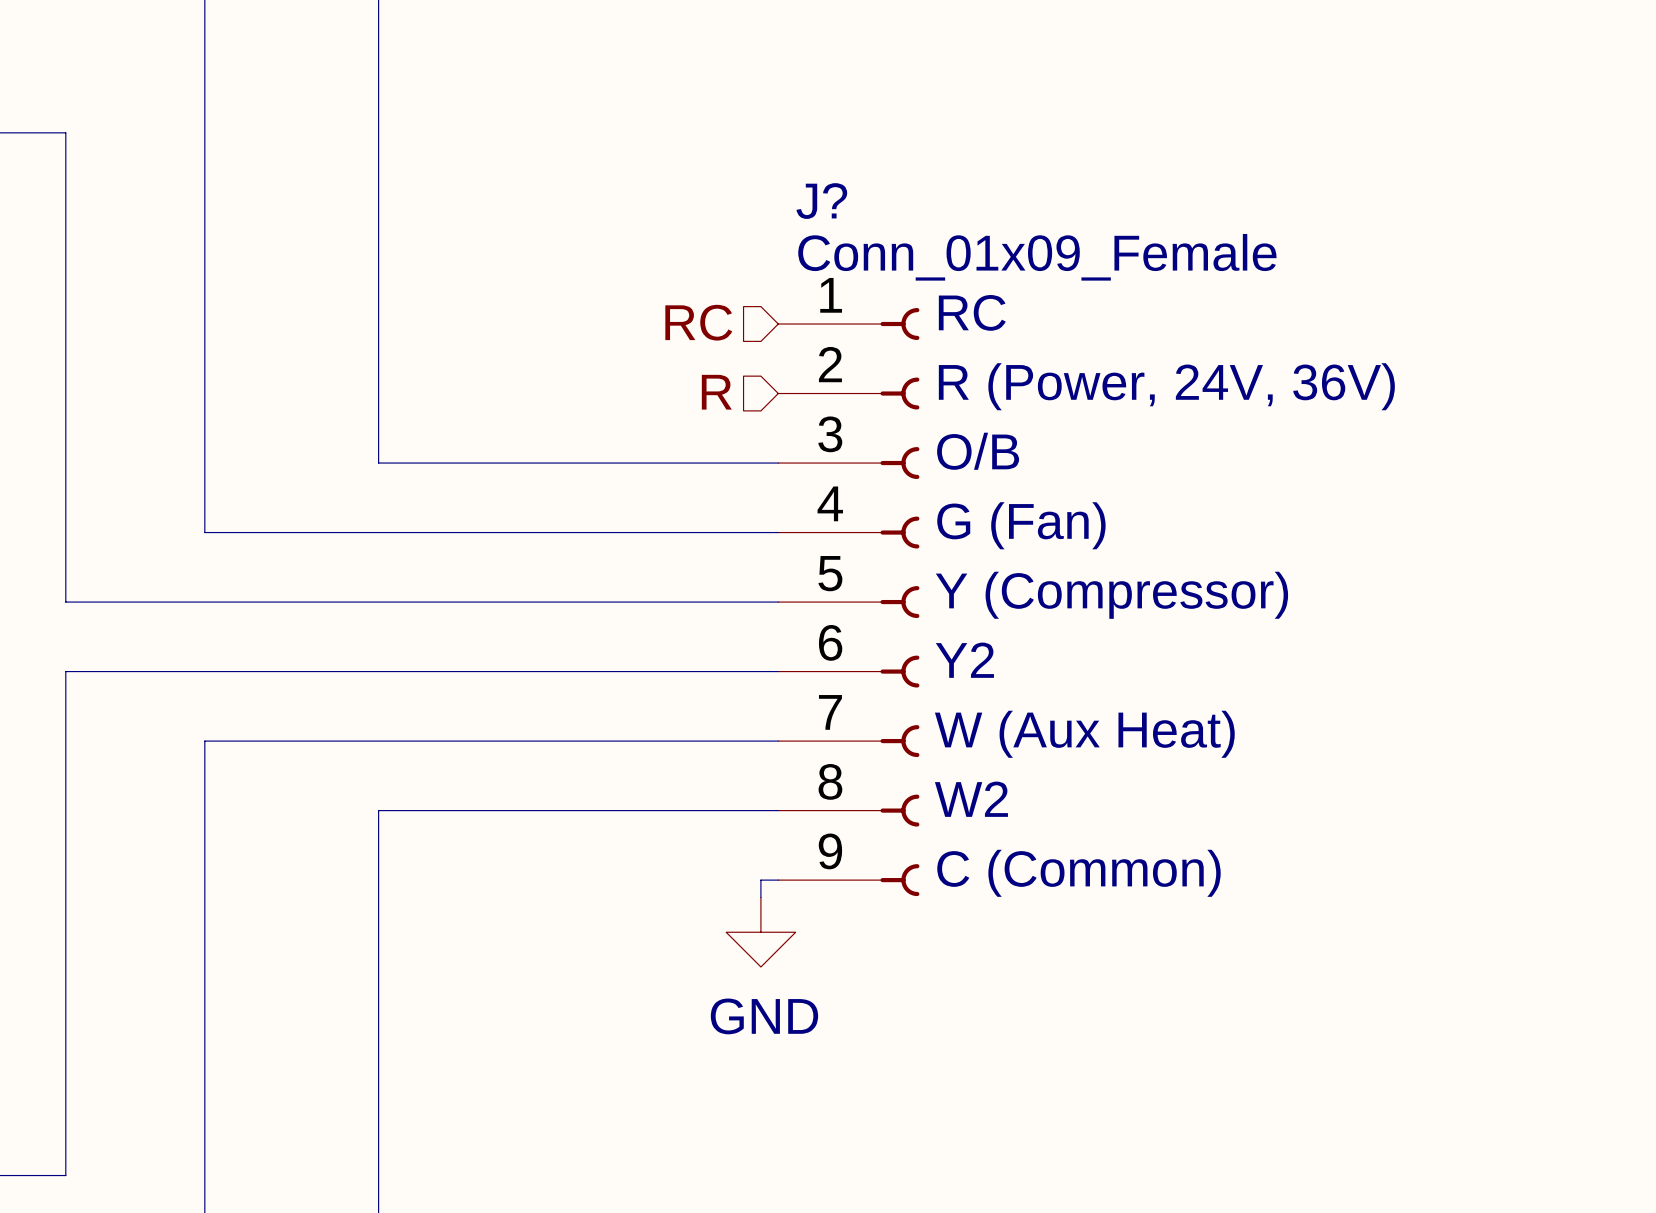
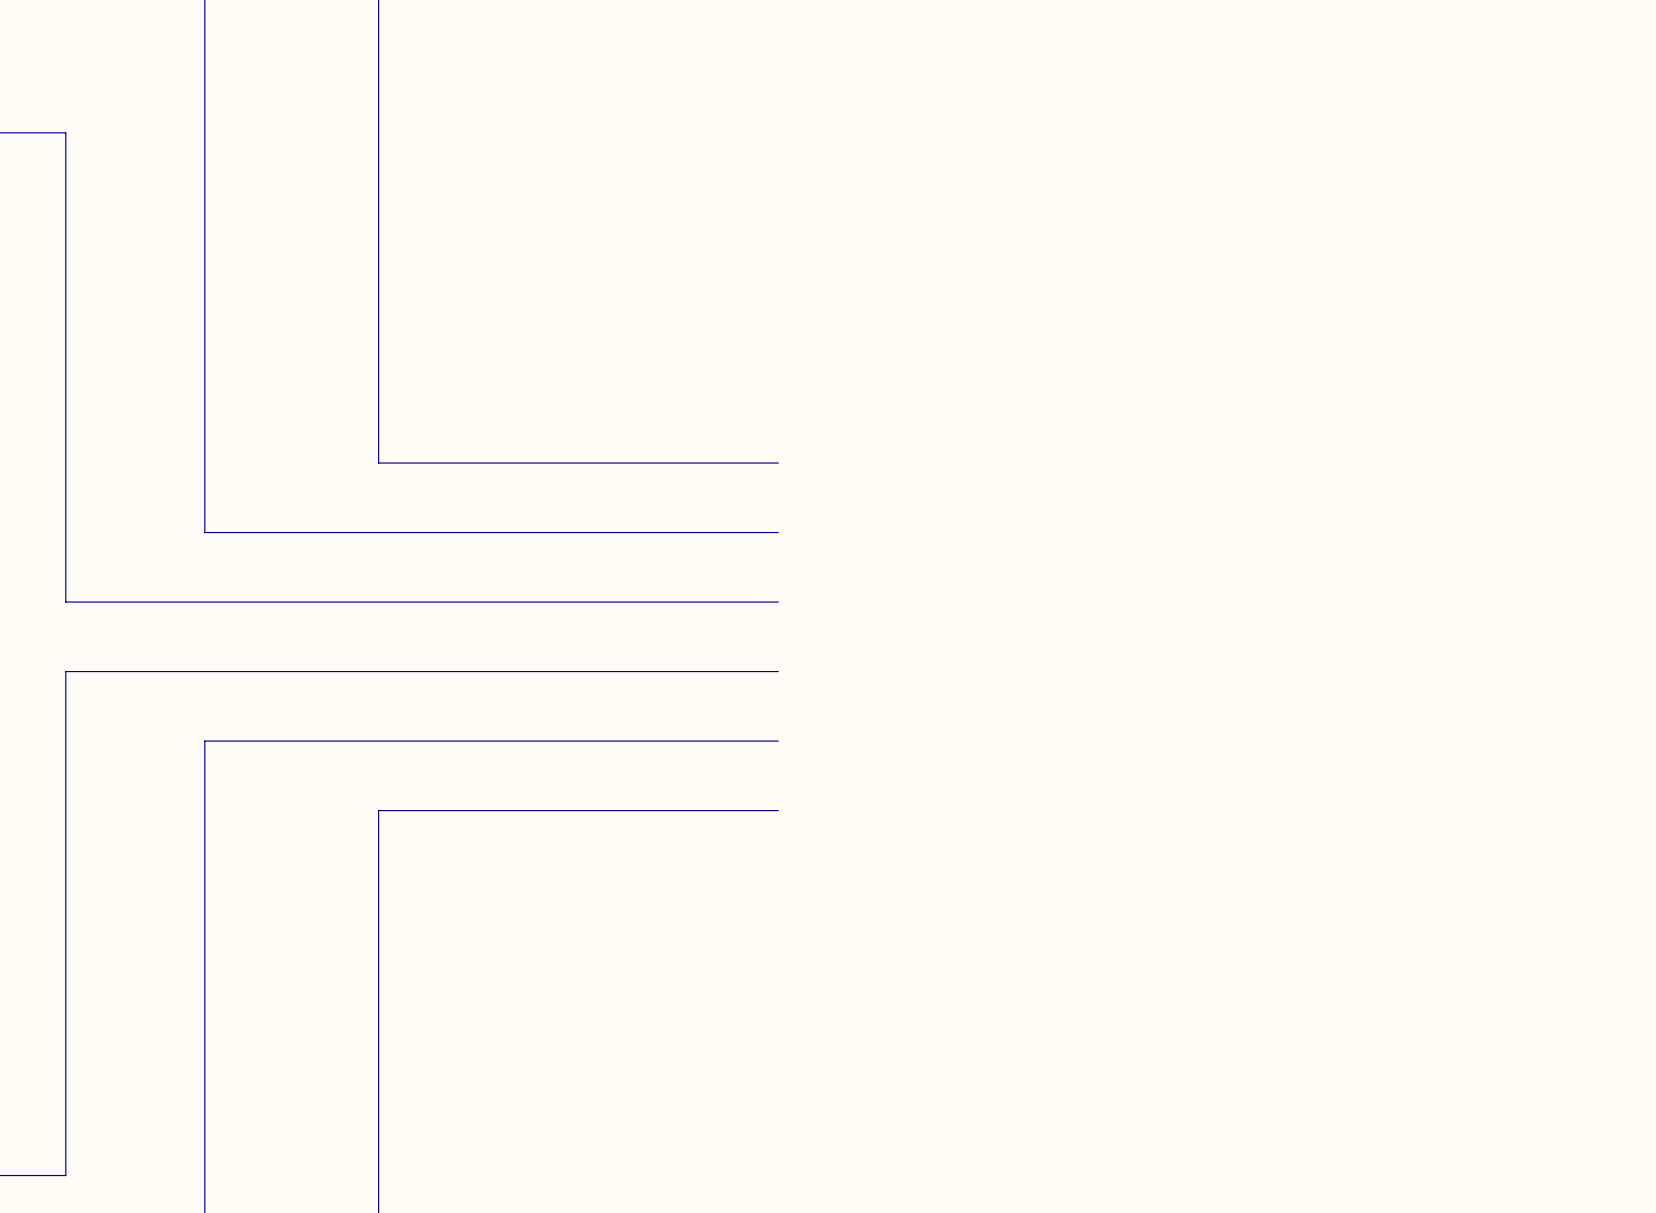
text: RC (972, 312) -> none
hierarchical label: RC (698, 322) -> none
text: R (Power, 24V, 36V) (1166, 386) -> none
hierarchical label: R (716, 392) -> none
text: O/B (978, 451) -> none
text: G (Fan) (1021, 525) -> none
text: Y (Compressor) (1111, 595) -> none
J?: Conn_01x09_Female (848, 602) -> none
text: Y2 (964, 660) -> none
text: W (Aux Heat) (1084, 734) -> none
text: W2 (971, 799) -> none
text: C (Common) (1078, 873) -> none
wire: (778, 880) (760, 880) (760, 897) -> none
power symbol: GND (760, 932) -> none

